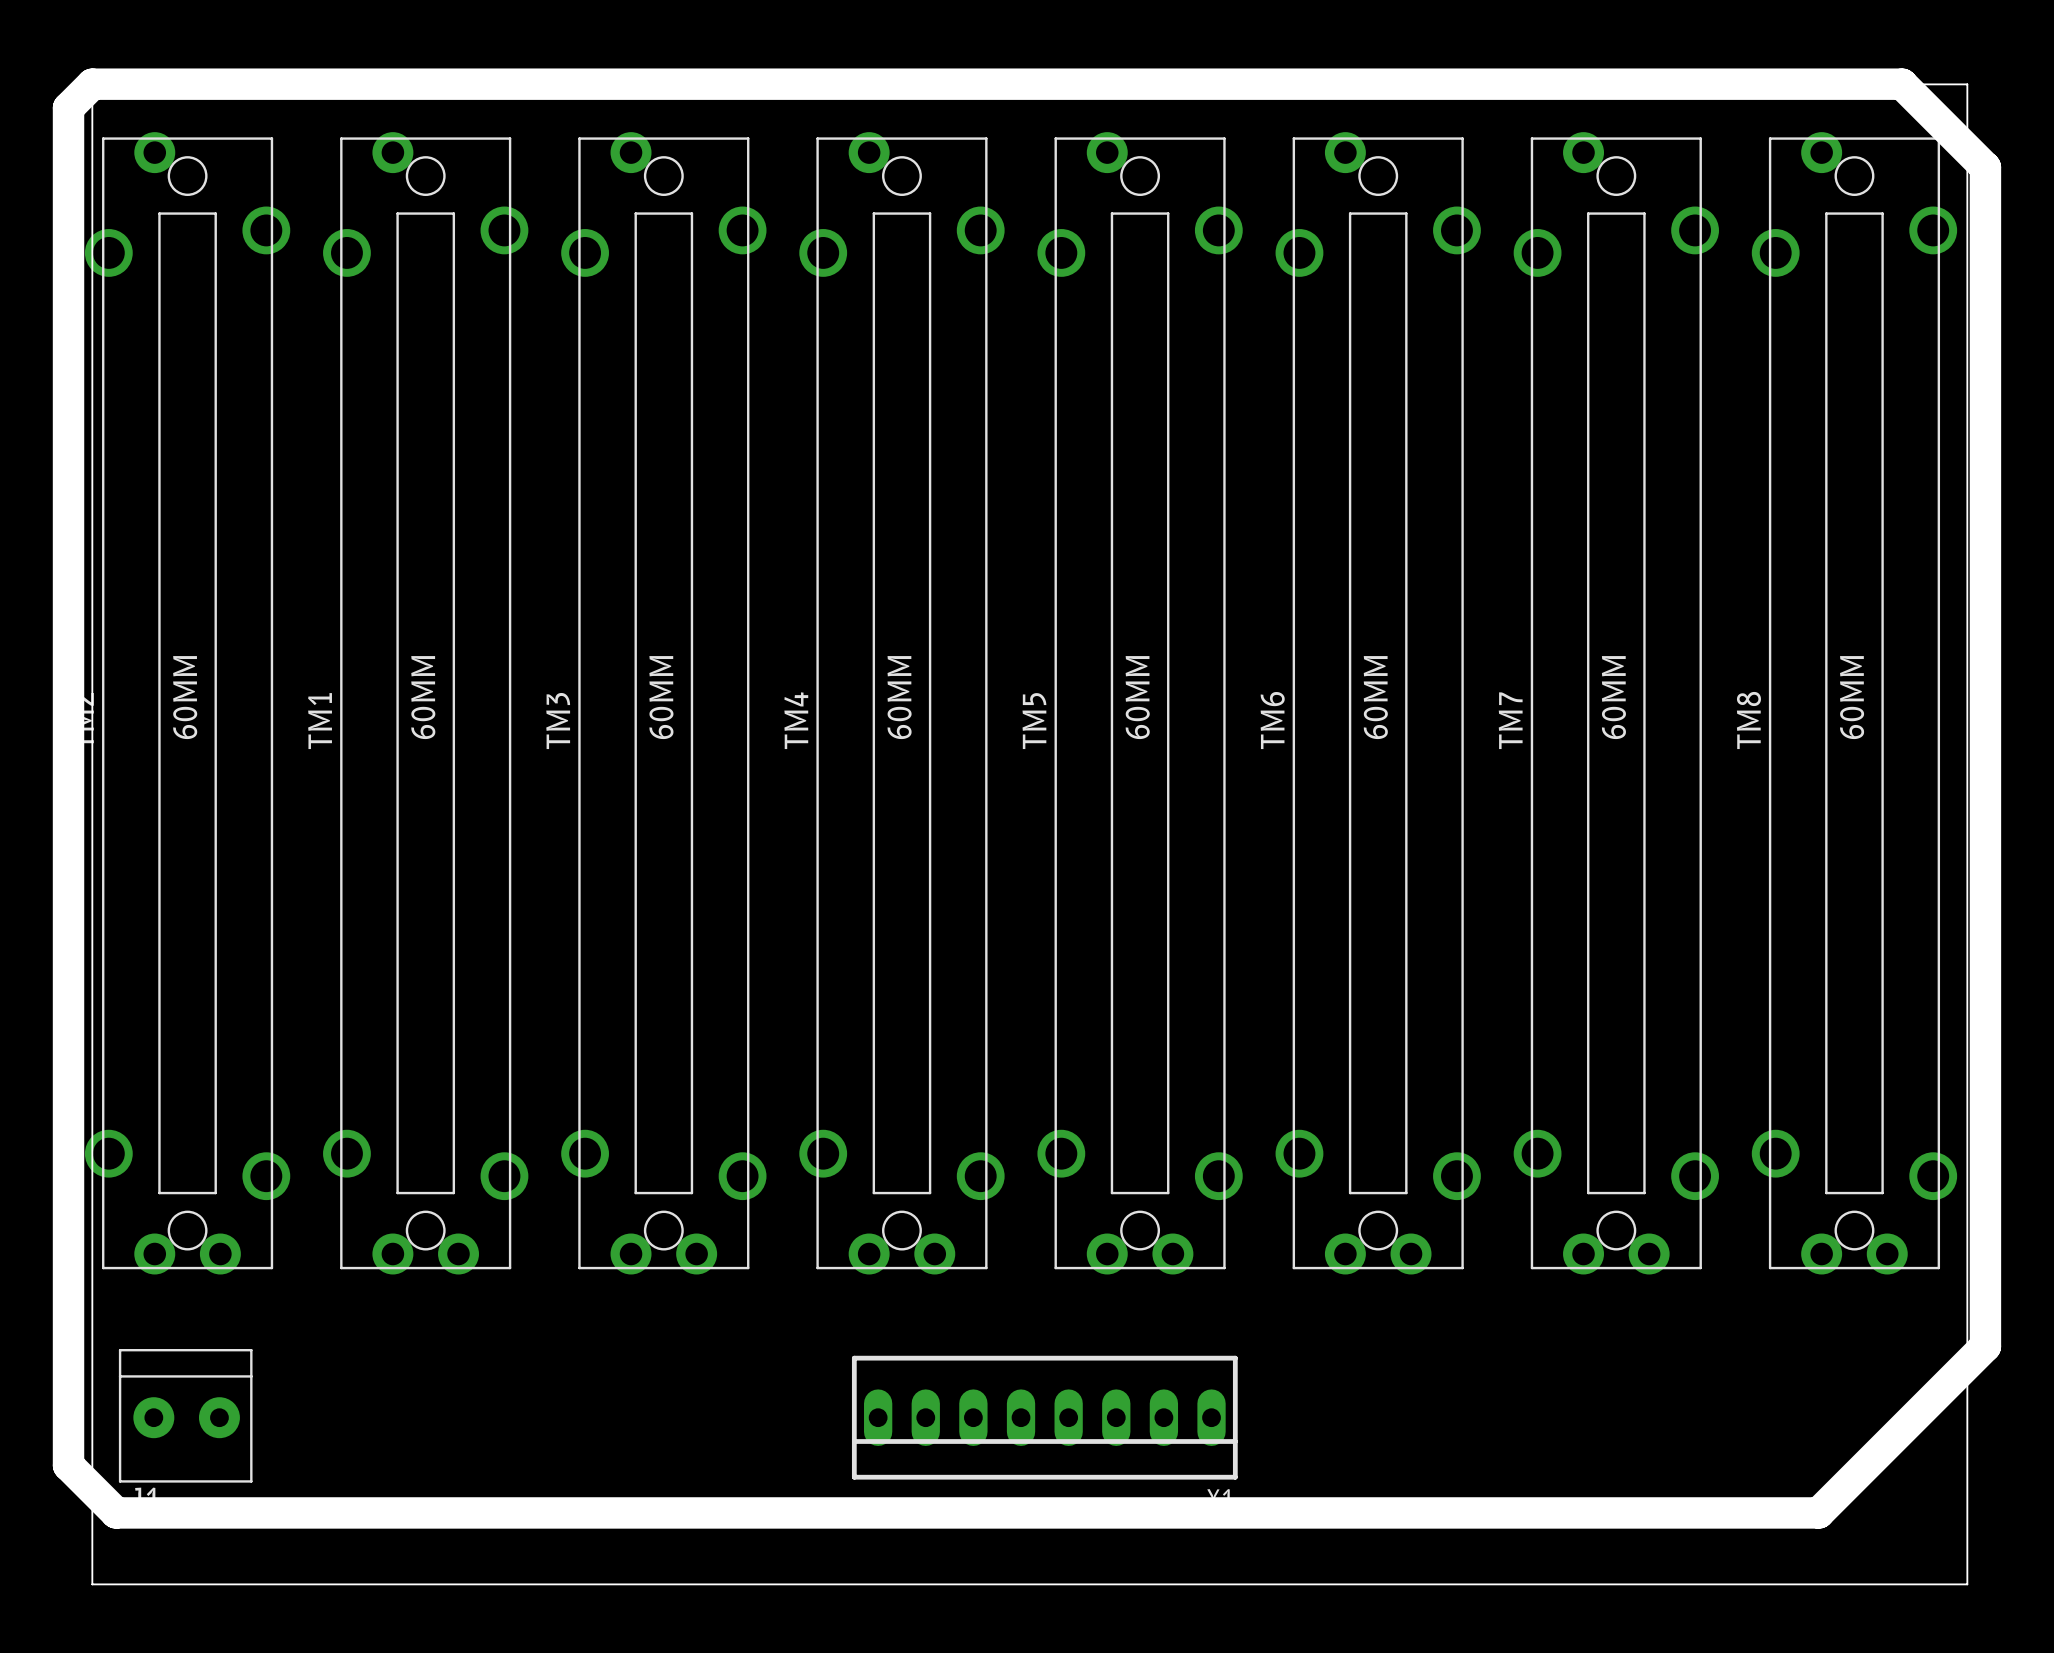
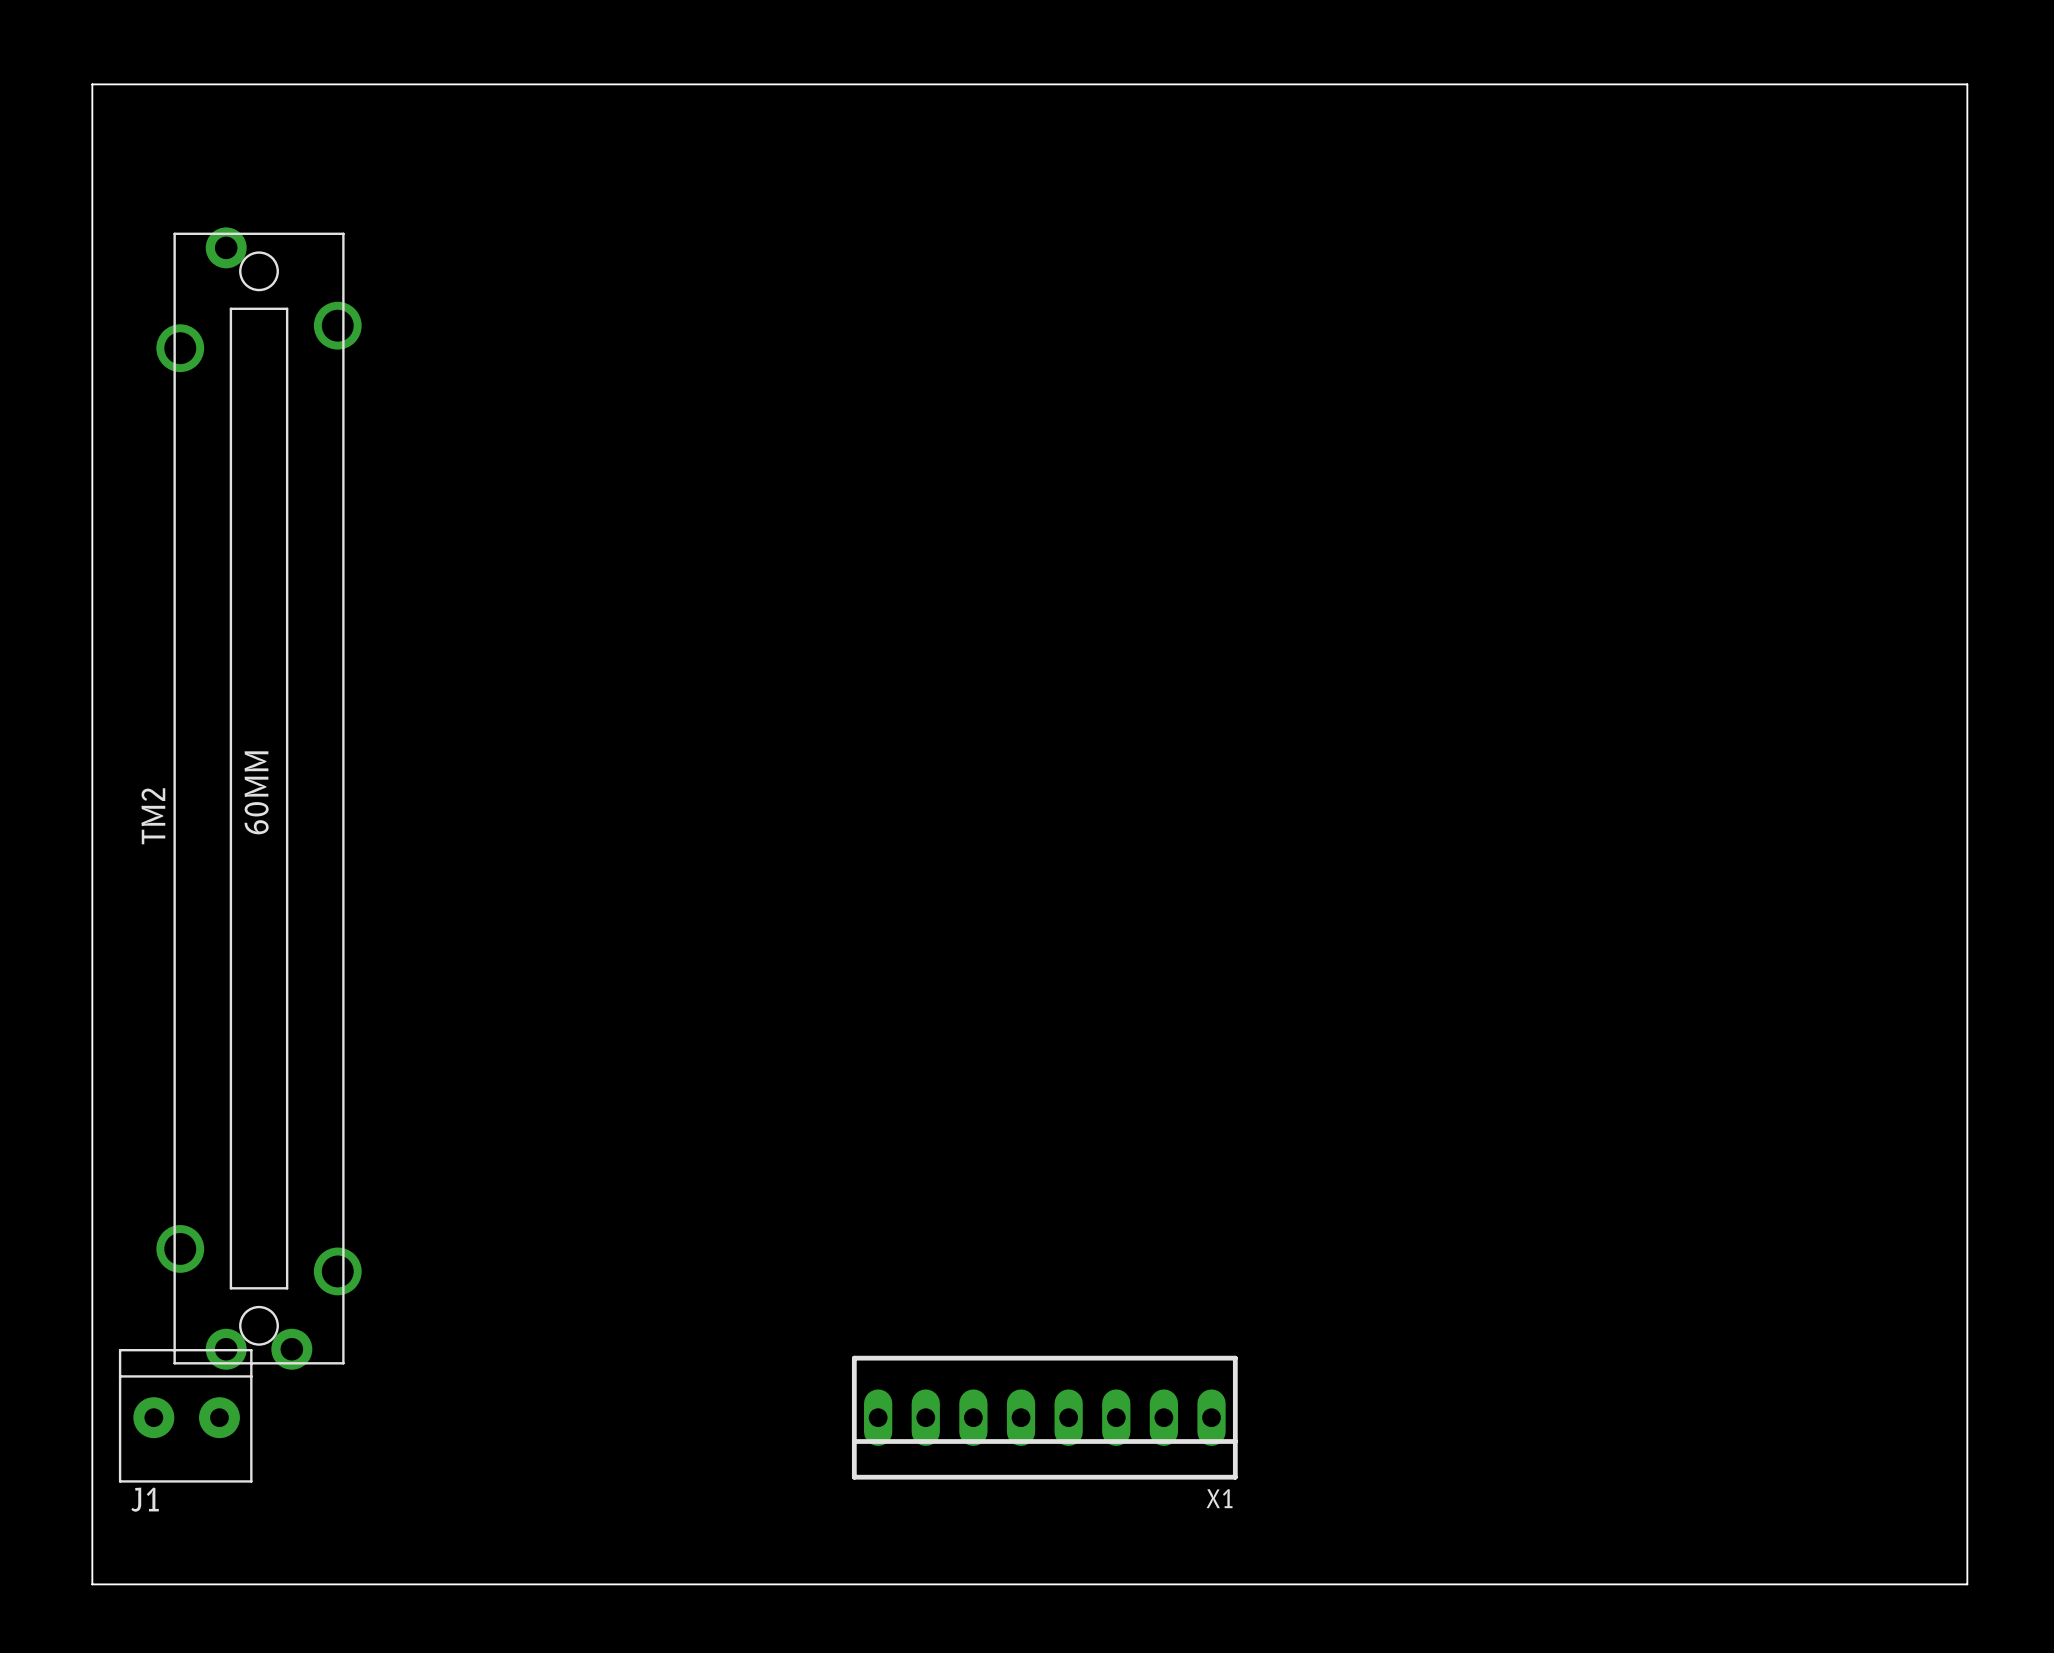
board edge: (92, 84) (1902, 84) (1985, 167) (1985, 1346) (1818, 1512) (116, 1512) (68, 1465) (68, 107) (92, 84) -> none
TM2 position: (187, 703) -> (259, 798)
TM1: (425, 703) -> none
TM3: (663, 703) -> none
TM4: (901, 703) -> none
TM5: (1140, 703) -> none
TM6: (1378, 703) -> none
TM7: (1616, 703) -> none
TM8: (1854, 703) -> none

